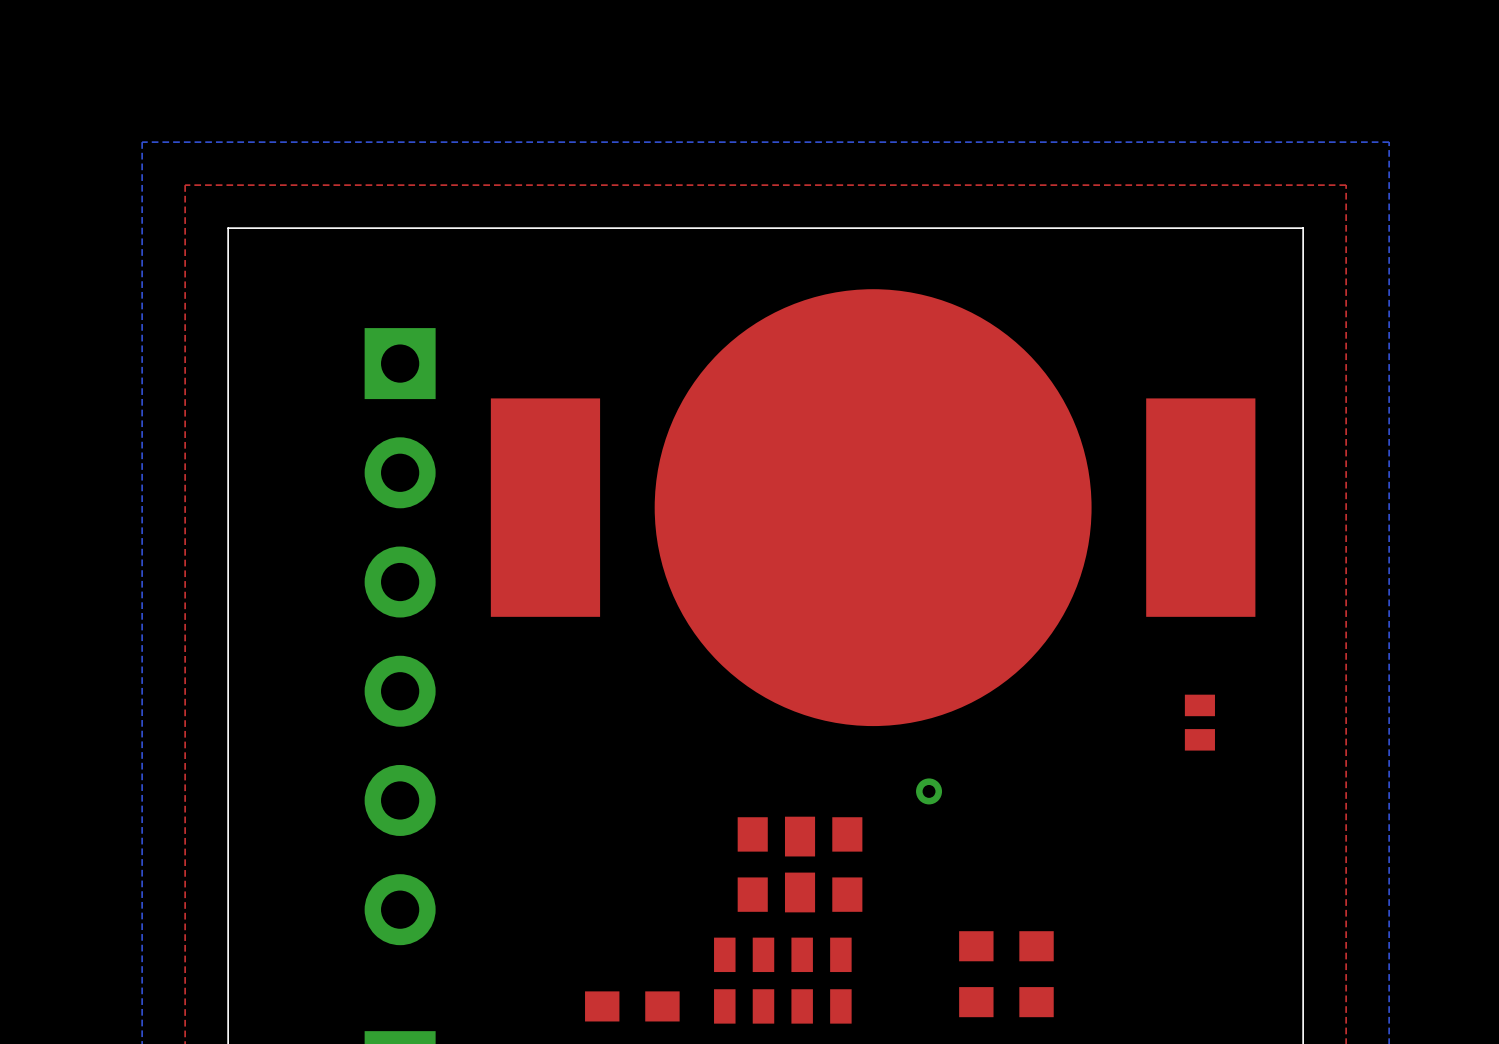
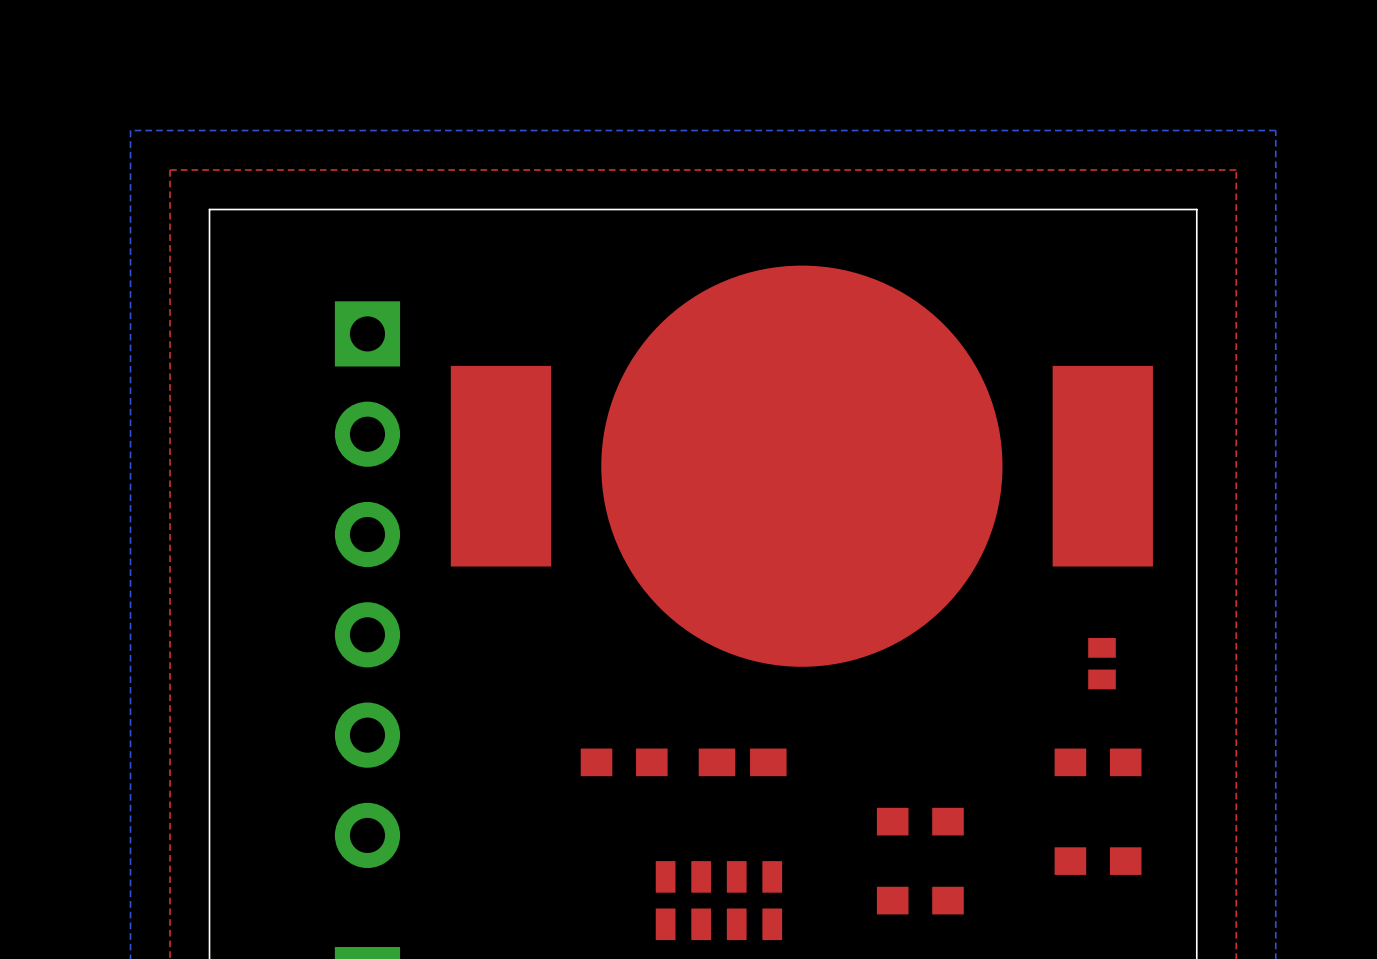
via: (929, 791) -> none
part: none -> (1098, 762)
part rotation: 0° (752, 864) -> 90° clockwise (624, 762)
part position: (752, 864) -> (624, 762)
part rotation: 0° (800, 864) -> 90° clockwise (742, 762)
part: (847, 864) -> none
part: none -> (920, 821)
part: none -> (1098, 861)
part: (1006, 946) -> none
part: none -> (920, 900)
part: (1006, 1002) -> none
part: (632, 1006) -> none

